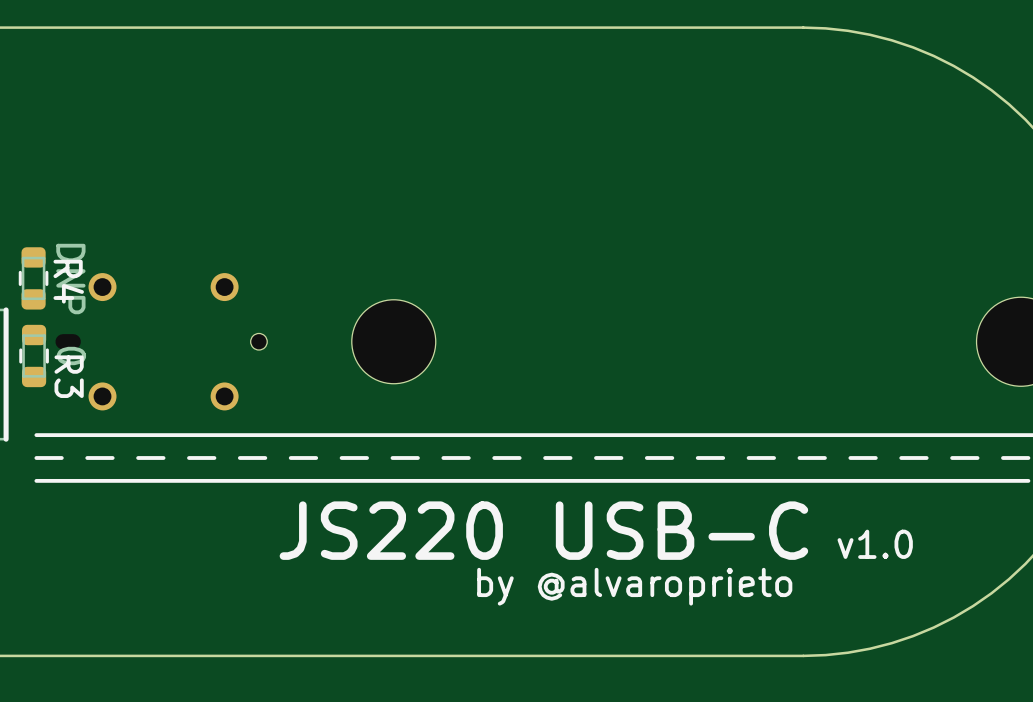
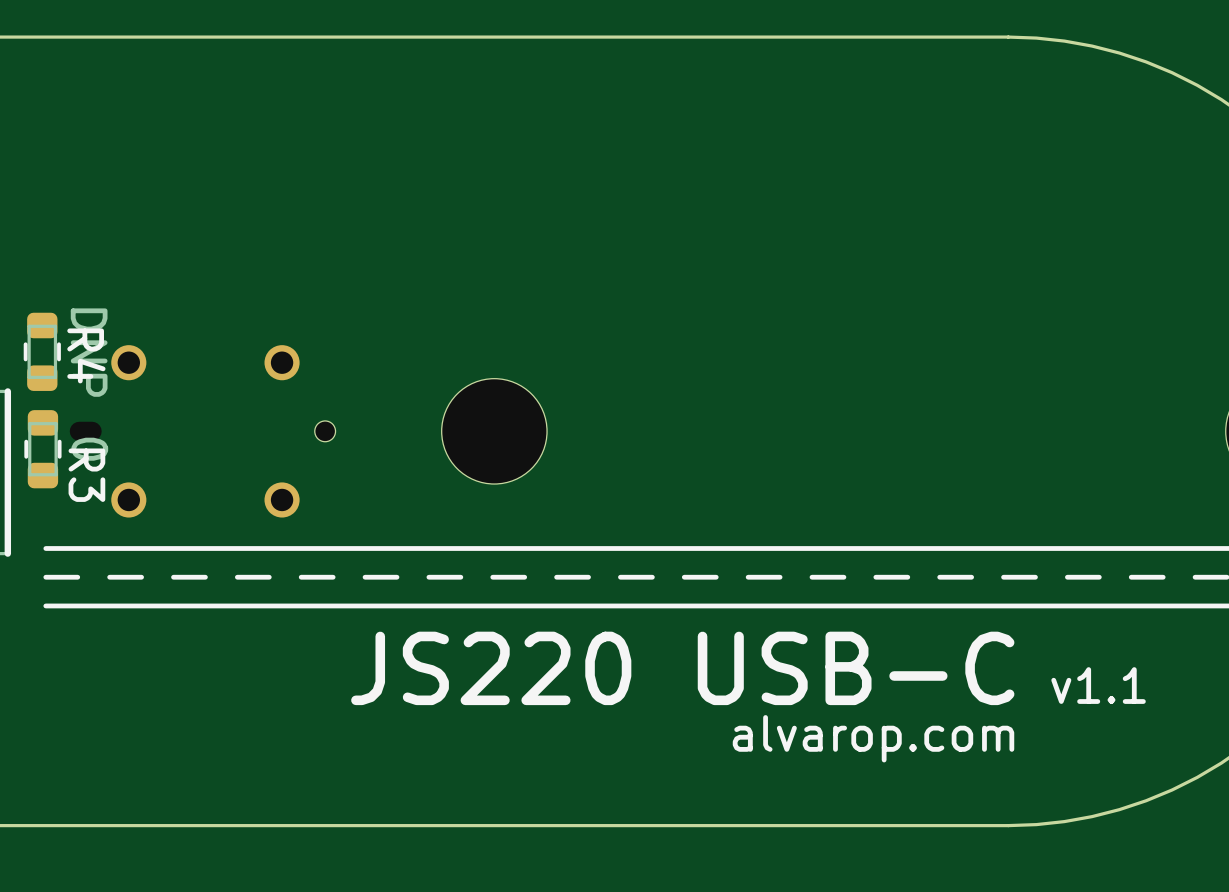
text: v1.0 (875, 544) -> v1.1 (1098, 685)
text: by @alvaroprieto (634, 586) -> none
text: none -> alvarop.com (873, 738)

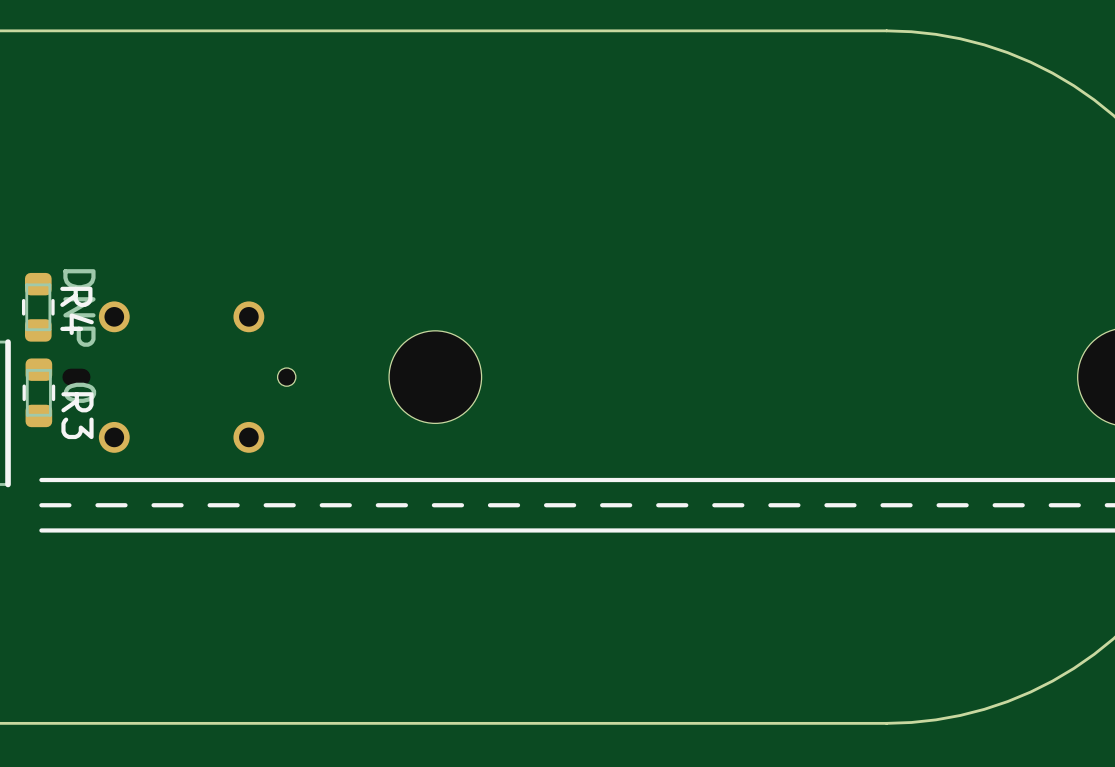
text: JS220 USB-C (682, 668) -> none
text: v1.1 (1098, 685) -> none
text: alvarop.com (873, 738) -> none

